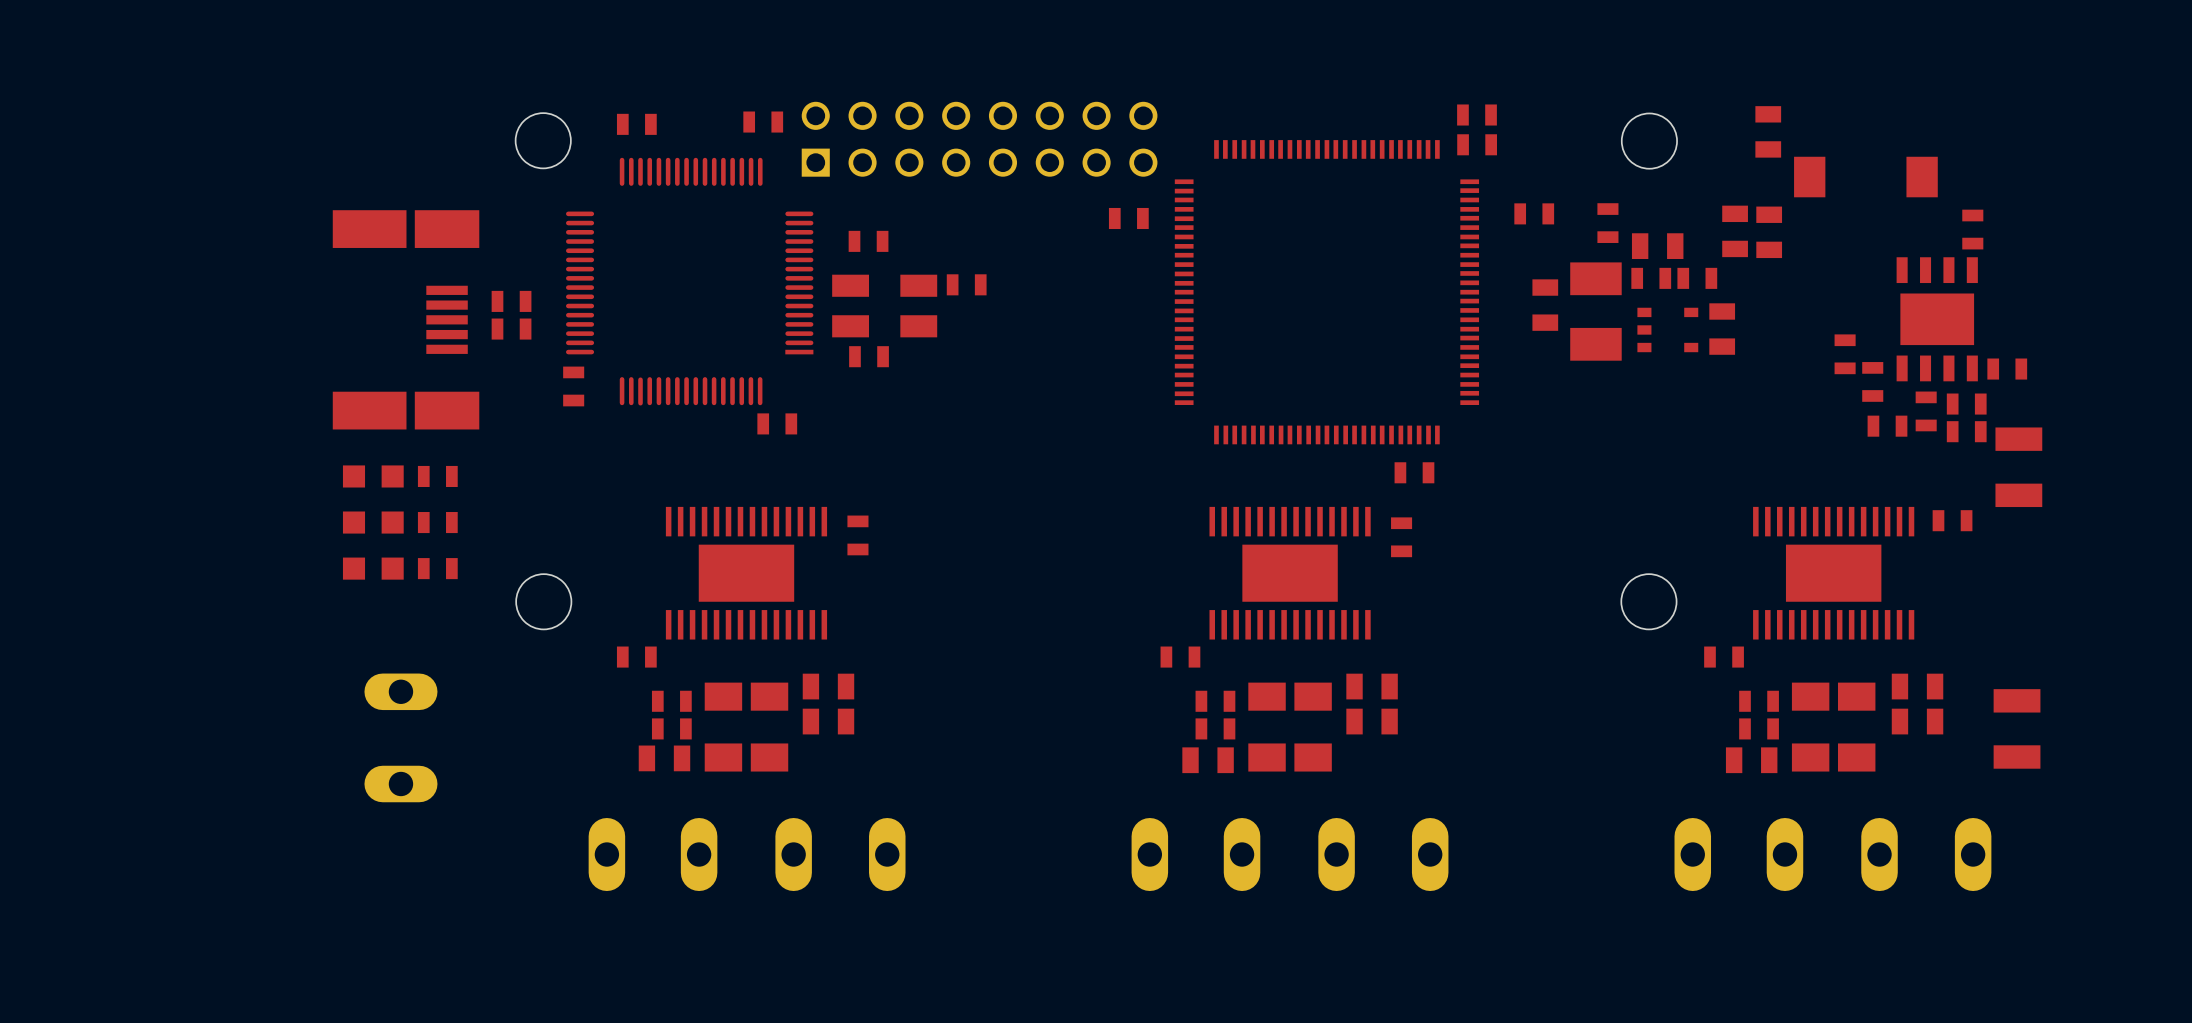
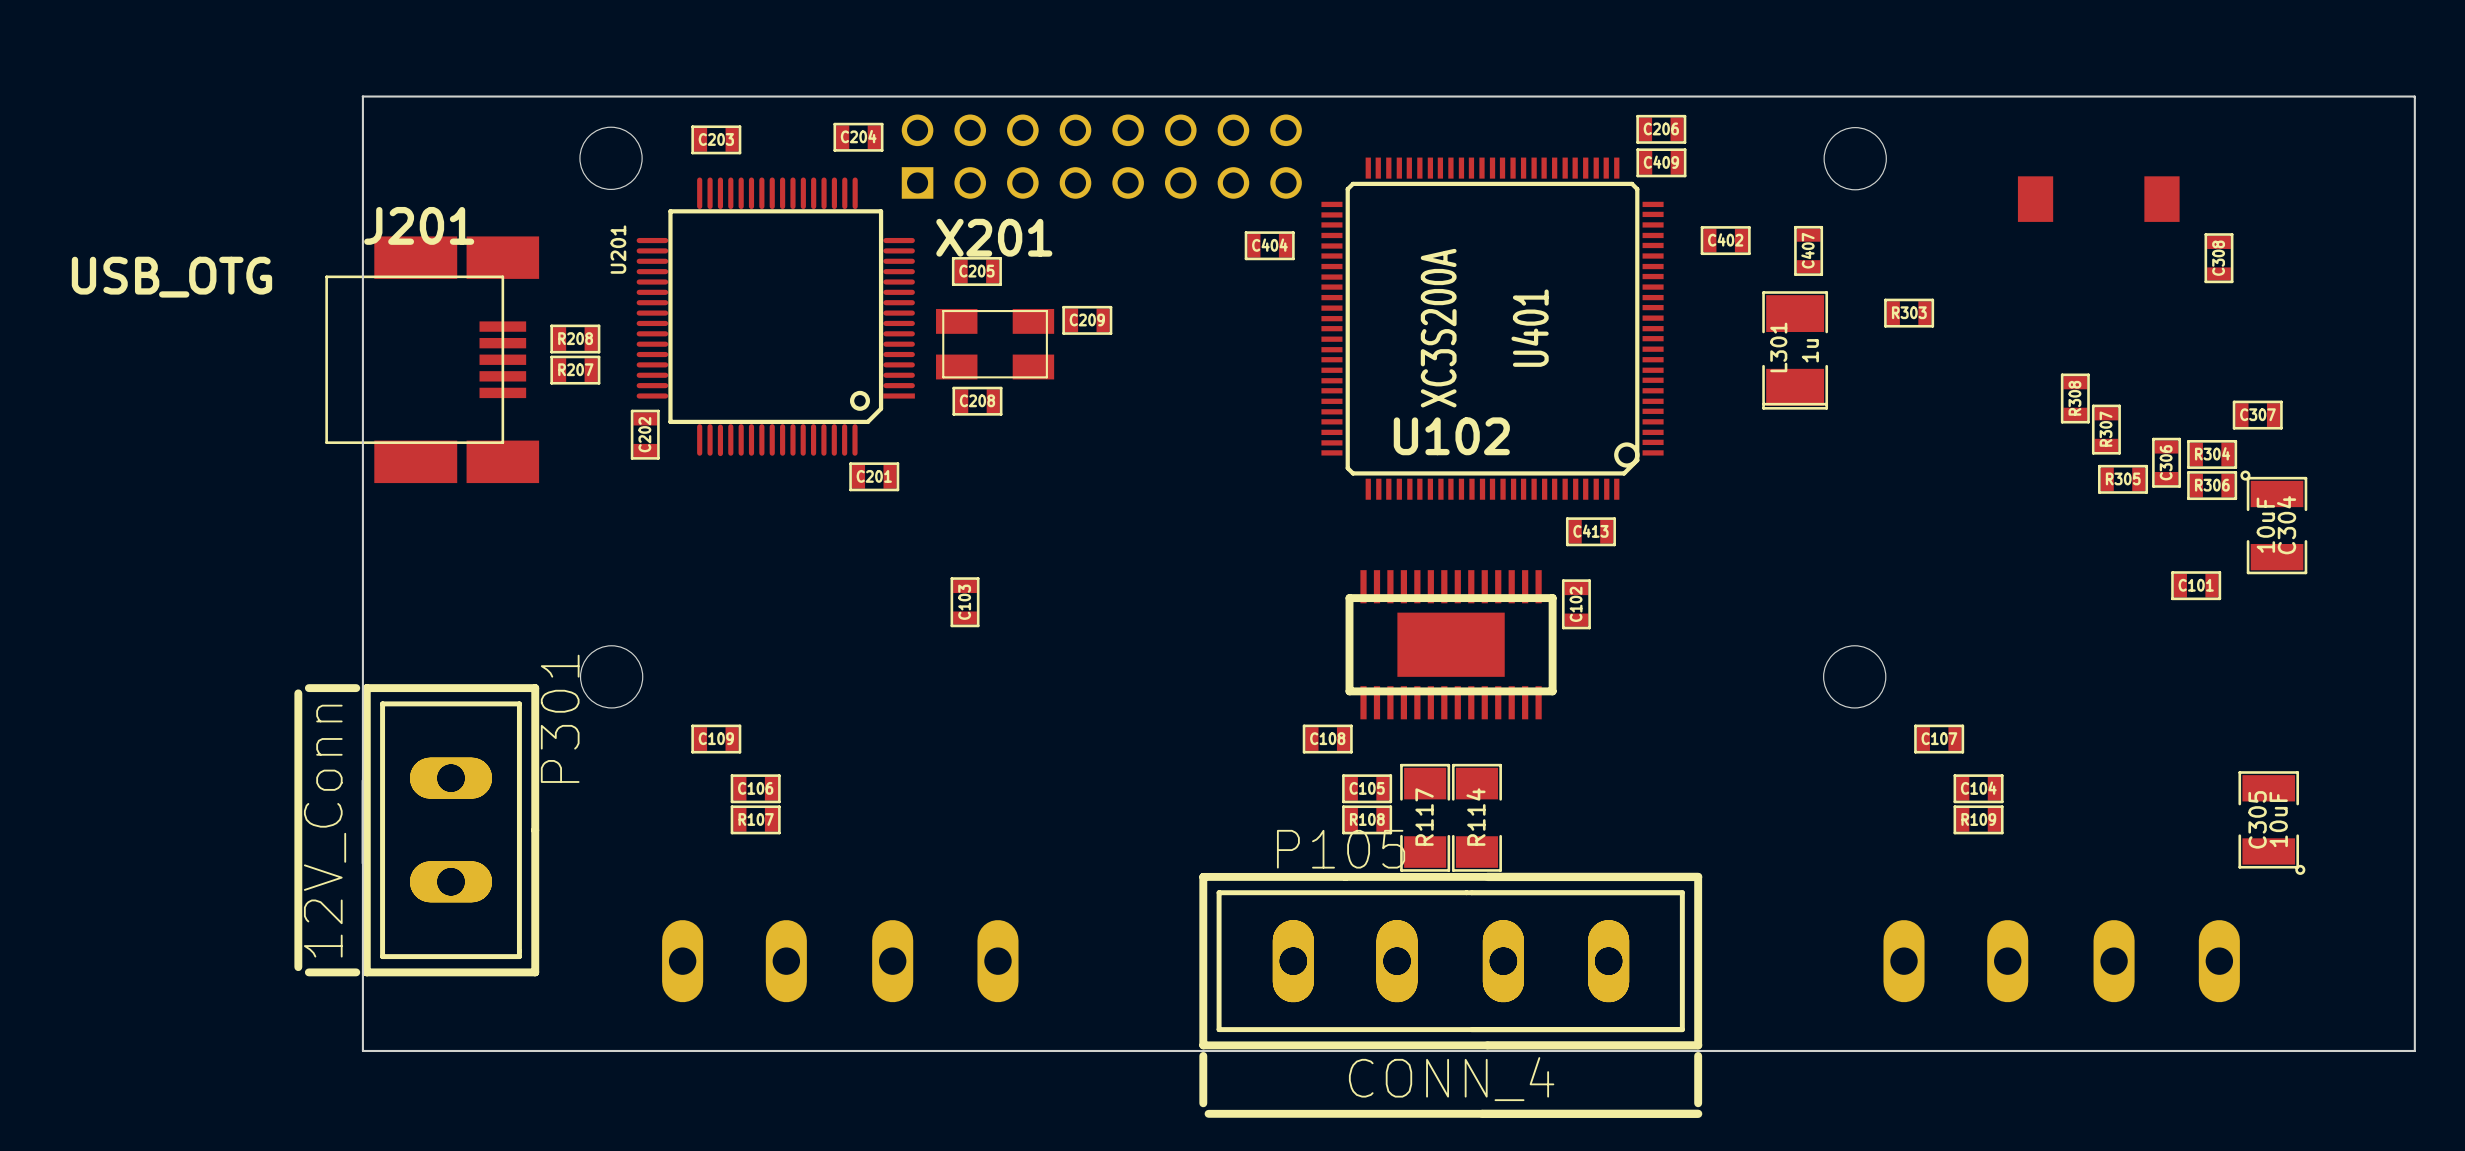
board edge: none -> (362, 96) (2414, 96)
board edge: none -> (362, 96) (362, 1050) (2414, 1050) (2414, 96)
part: (1477, 115) -> none
C206: none -> (1661, 129)
part: (763, 122) -> none
C204: none -> (858, 137)
part: (636, 124) -> none
C203: none -> (716, 139)
part: (1768, 131) -> none
part: (1477, 144) -> none
C409: none -> (1661, 162)
part: (1534, 213) -> none
C402: none -> (1725, 240)
part: (1128, 218) -> none
C404: none -> (1269, 245)
part: (1607, 223) -> none
C407: none -> (1808, 250)
part: (1972, 229) -> none
C308: none -> (2218, 258)
part: (1735, 231) -> none
part: (1769, 232) -> none
part: (868, 241) -> none
C205: none -> (976, 271)
part: (1657, 246) -> none
part: (1651, 278) -> none
part: (1697, 278) -> none
R303: none -> (1909, 313)
part: (689, 281) -> none
U201: none -> (775, 316)
part: (966, 284) -> none
C209: none -> (1087, 320)
part: (1326, 292) -> none
U401: none -> XC3S200A (1492, 328)
part: (511, 301) -> none
R208: none -> (575, 339)
part: (1545, 305) -> none
part: (884, 306) -> none
X201: none -> (995, 344)
part: (1595, 311) -> none
L301: none -> 1u (1795, 350)
J201: none -> USB_OTG (432, 359)
part: (406, 319) -> none
part: (1937, 319) -> none
part: (511, 329) -> none
R207: none -> (575, 370)
part: (1667, 329) -> none
part: (1722, 329) -> none
part: (1845, 354) -> none
R308: none -> (2075, 398)
part: (869, 356) -> none
C208: none -> (977, 401)
part: (2007, 369) -> none
C307: none -> (2257, 415)
part: (1872, 381) -> none
R307: none -> (2106, 429)
part: (573, 386) -> none
C202: none -> (645, 434)
part: (1966, 404) -> none
R304: none -> (2212, 454)
part: (1926, 411) -> none
C306: none -> (2166, 462)
part: (777, 423) -> none
C201: none -> (874, 476)
part: (1887, 426) -> none
R305: none -> (2123, 479)
part: (1966, 431) -> none
R306: none -> (2212, 485)
C304: none -> 10uF (2273, 522)
part: (2018, 467) -> none
part: (1414, 472) -> none
C413: none -> (1590, 531)
part: (373, 476) -> none
part: (437, 476) -> none
part: (1952, 520) -> none
C101: none -> (2196, 585)
part: (373, 522) -> none
part: (437, 522) -> none
part: (857, 535) -> none
C103: none -> (965, 602)
part: (1401, 537) -> none
C102: none -> (1576, 604)
part: (373, 568) -> none
part: (437, 568) -> none
part: (746, 573) -> none
part: (1290, 573) -> none
U102: none -> (1451, 644)
part: (1833, 573) -> none
part: (636, 657) -> none
C109: none -> (716, 739)
part: (1180, 657) -> none
C108: none -> (1327, 739)
part: (1724, 657) -> none
C107: none -> (1939, 739)
part: (828, 686) -> none
part: (1372, 686) -> none
part: (1917, 686) -> none
part: (671, 701) -> none
C106: none -> (755, 788)
part: (1215, 701) -> none
C105: none -> (1367, 788)
part: (1759, 701) -> none
C104: none -> (1978, 788)
part: (828, 721) -> none
part: (1372, 721) -> none
part: (1917, 721) -> none
part: (723, 727) -> none
part: (769, 727) -> none
part: (1267, 727) -> none
R117: none -> (1425, 817)
part: (1313, 727) -> none
R114: none -> (1476, 817)
part: (1810, 727) -> none
part: (1856, 727) -> none
part: (671, 728) -> none
R107: none -> (755, 819)
part: (1215, 728) -> none
R108: none -> (1367, 819)
part: (1759, 728) -> none
R109: none -> (1978, 819)
part: (2017, 728) -> none
C305: none -> 10uF (2271, 823)
P301: none -> 12V_Conn (416, 830)
part: (664, 758) -> none
part: (1208, 760) -> none
part: (1751, 760) -> none
P105: none -> CONN_4 (1450, 995)

